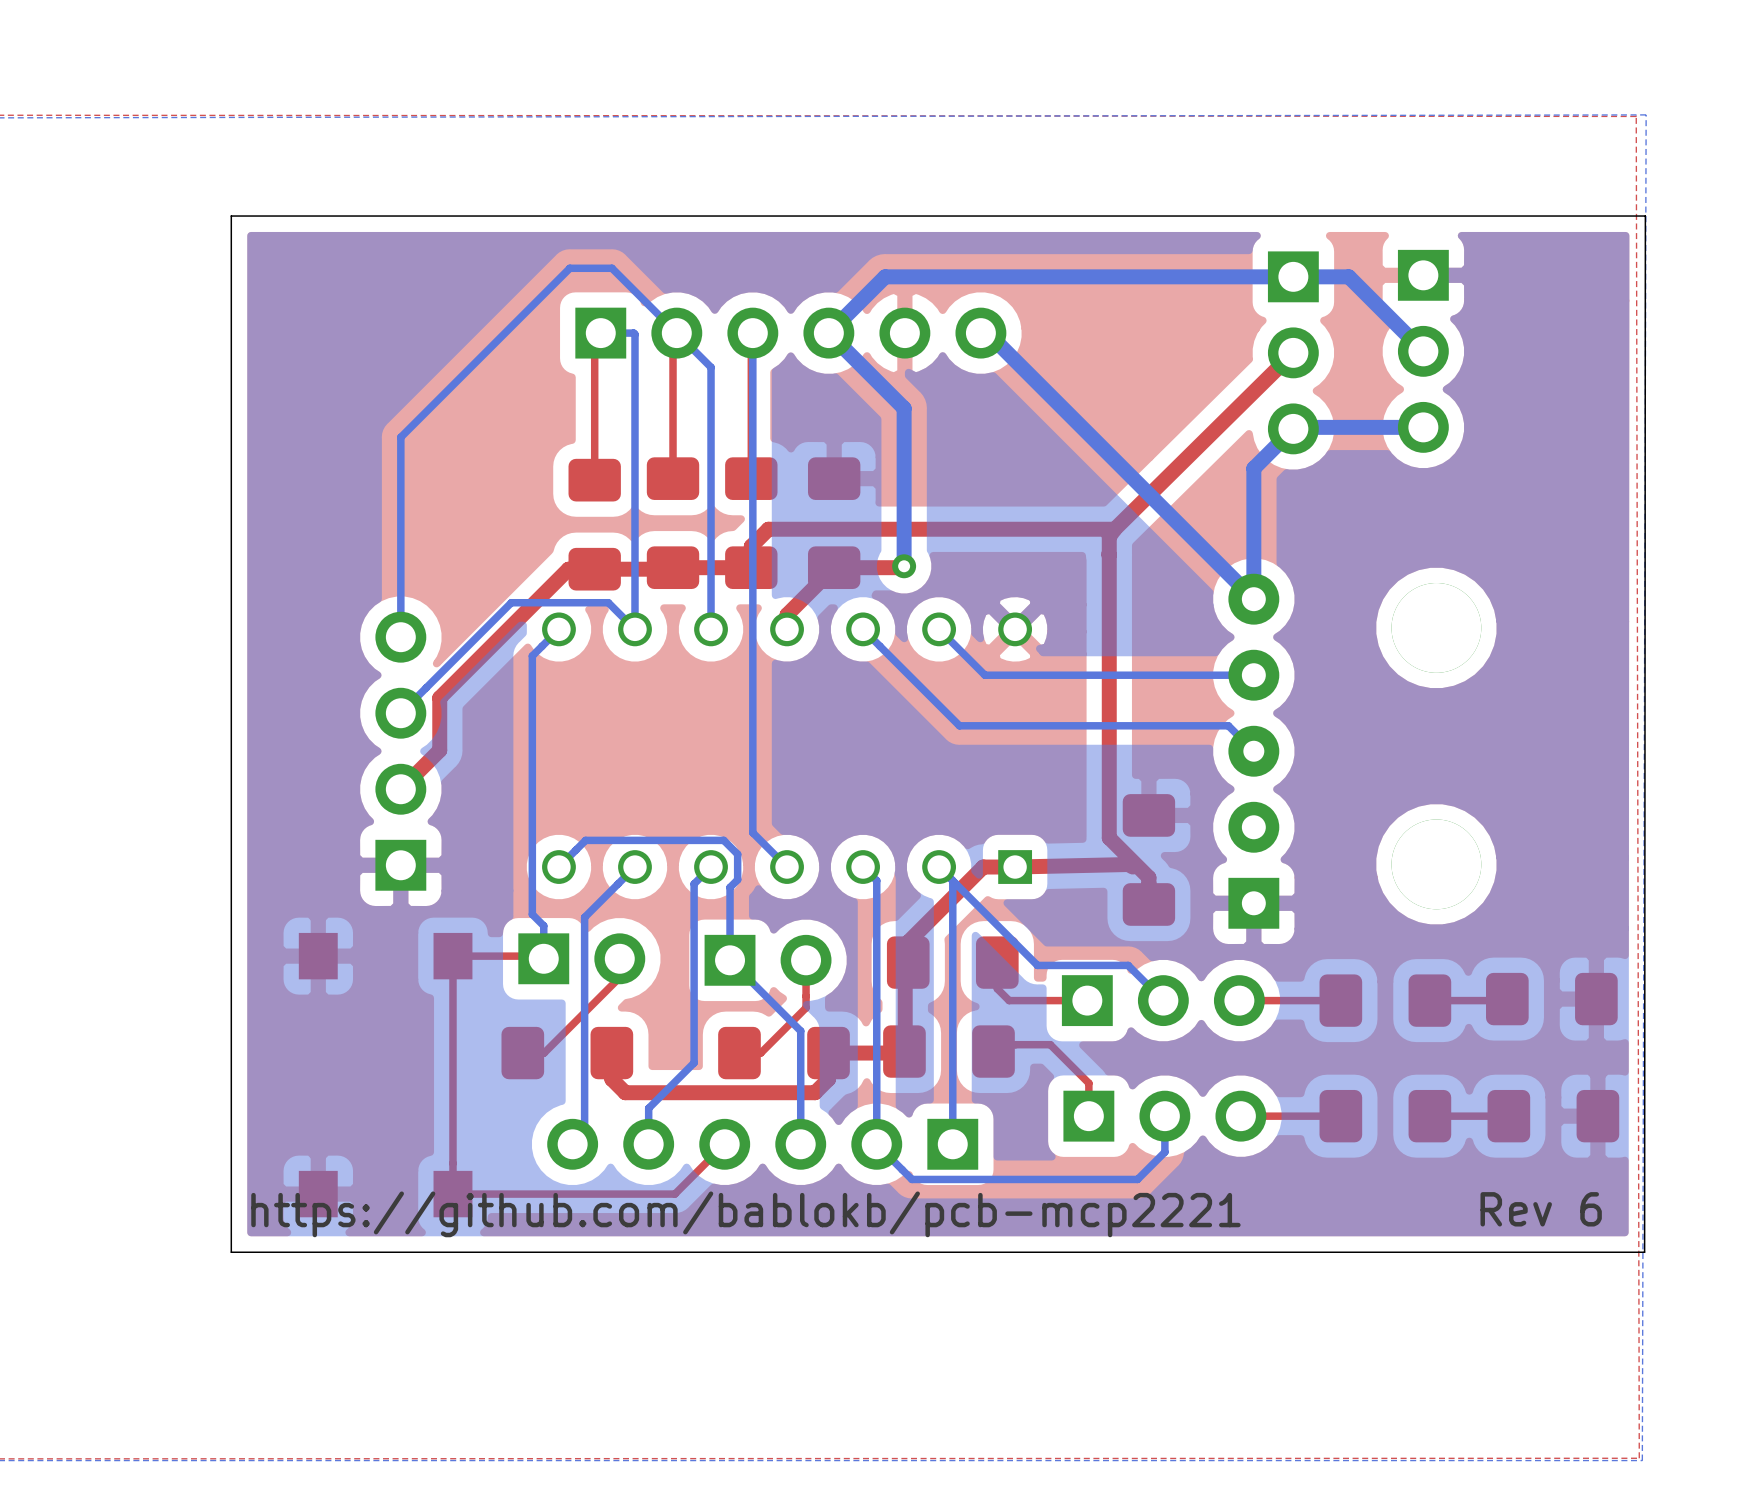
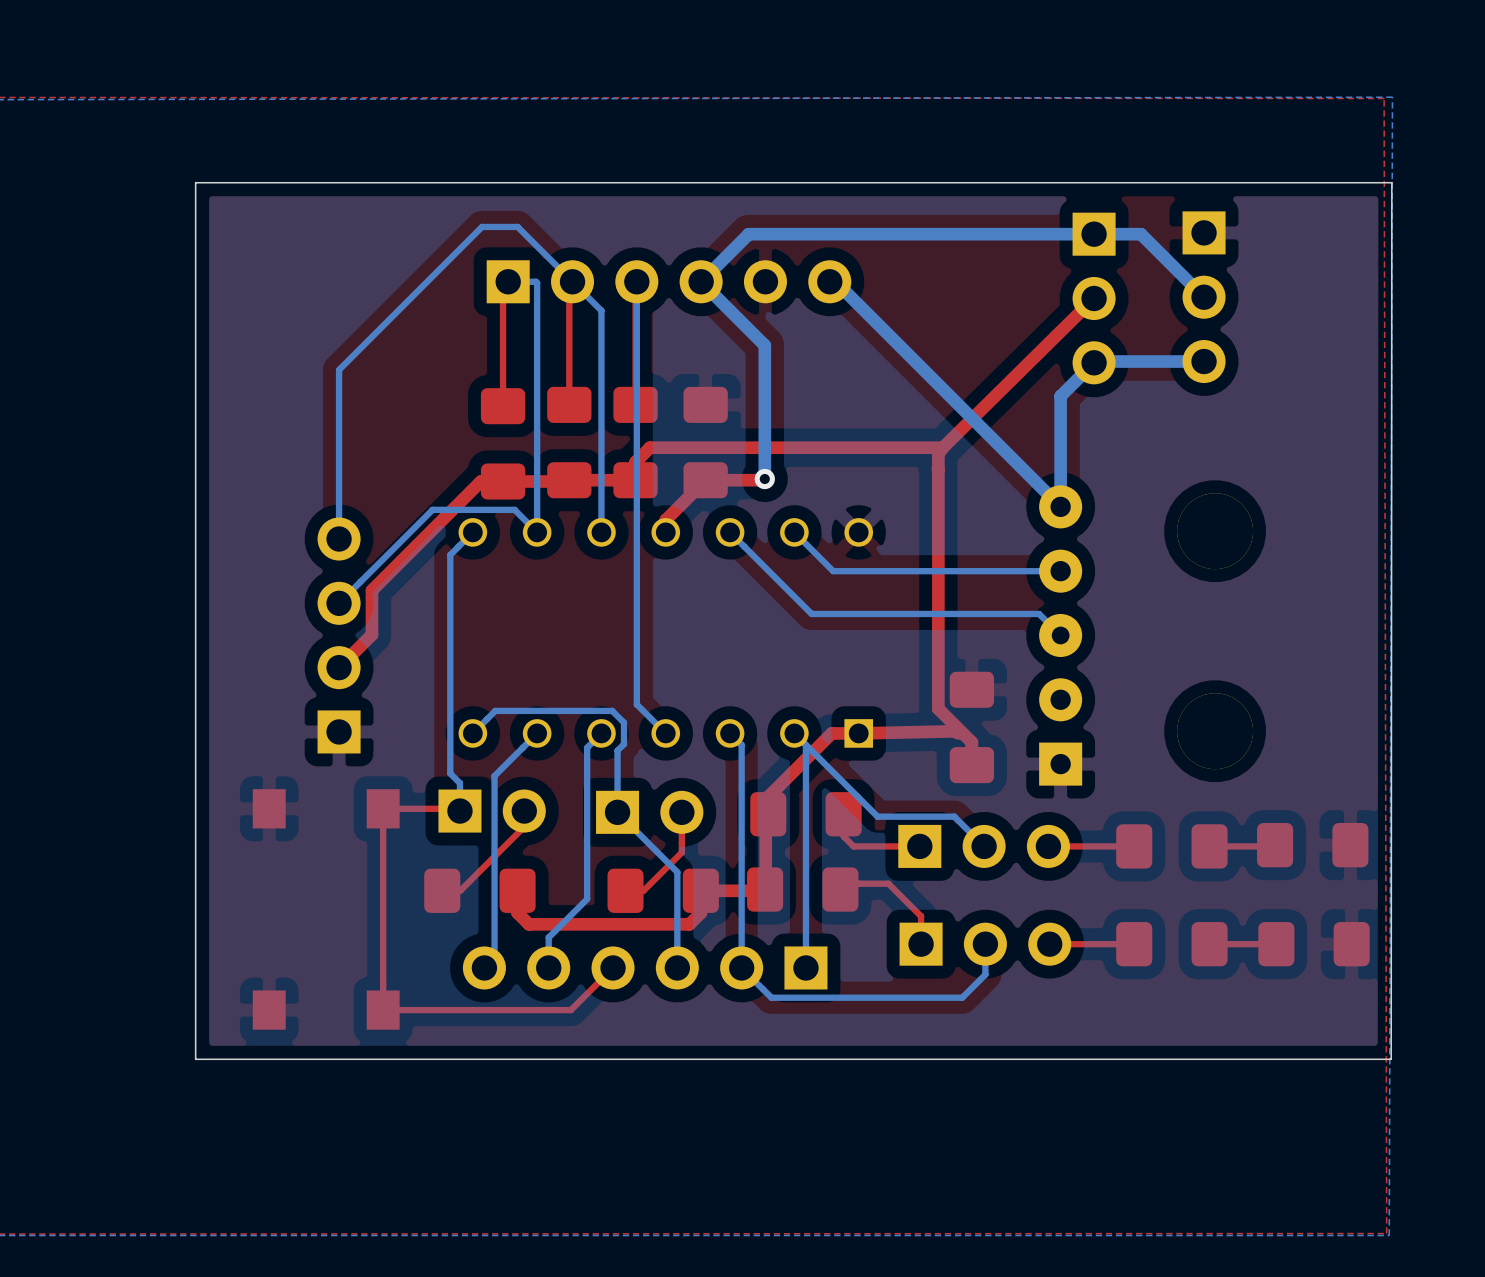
text: Rev 6 (1541, 1209) -> none
text: https://github.com/bablokb/pcb-mcp2221 (745, 1214) -> none

